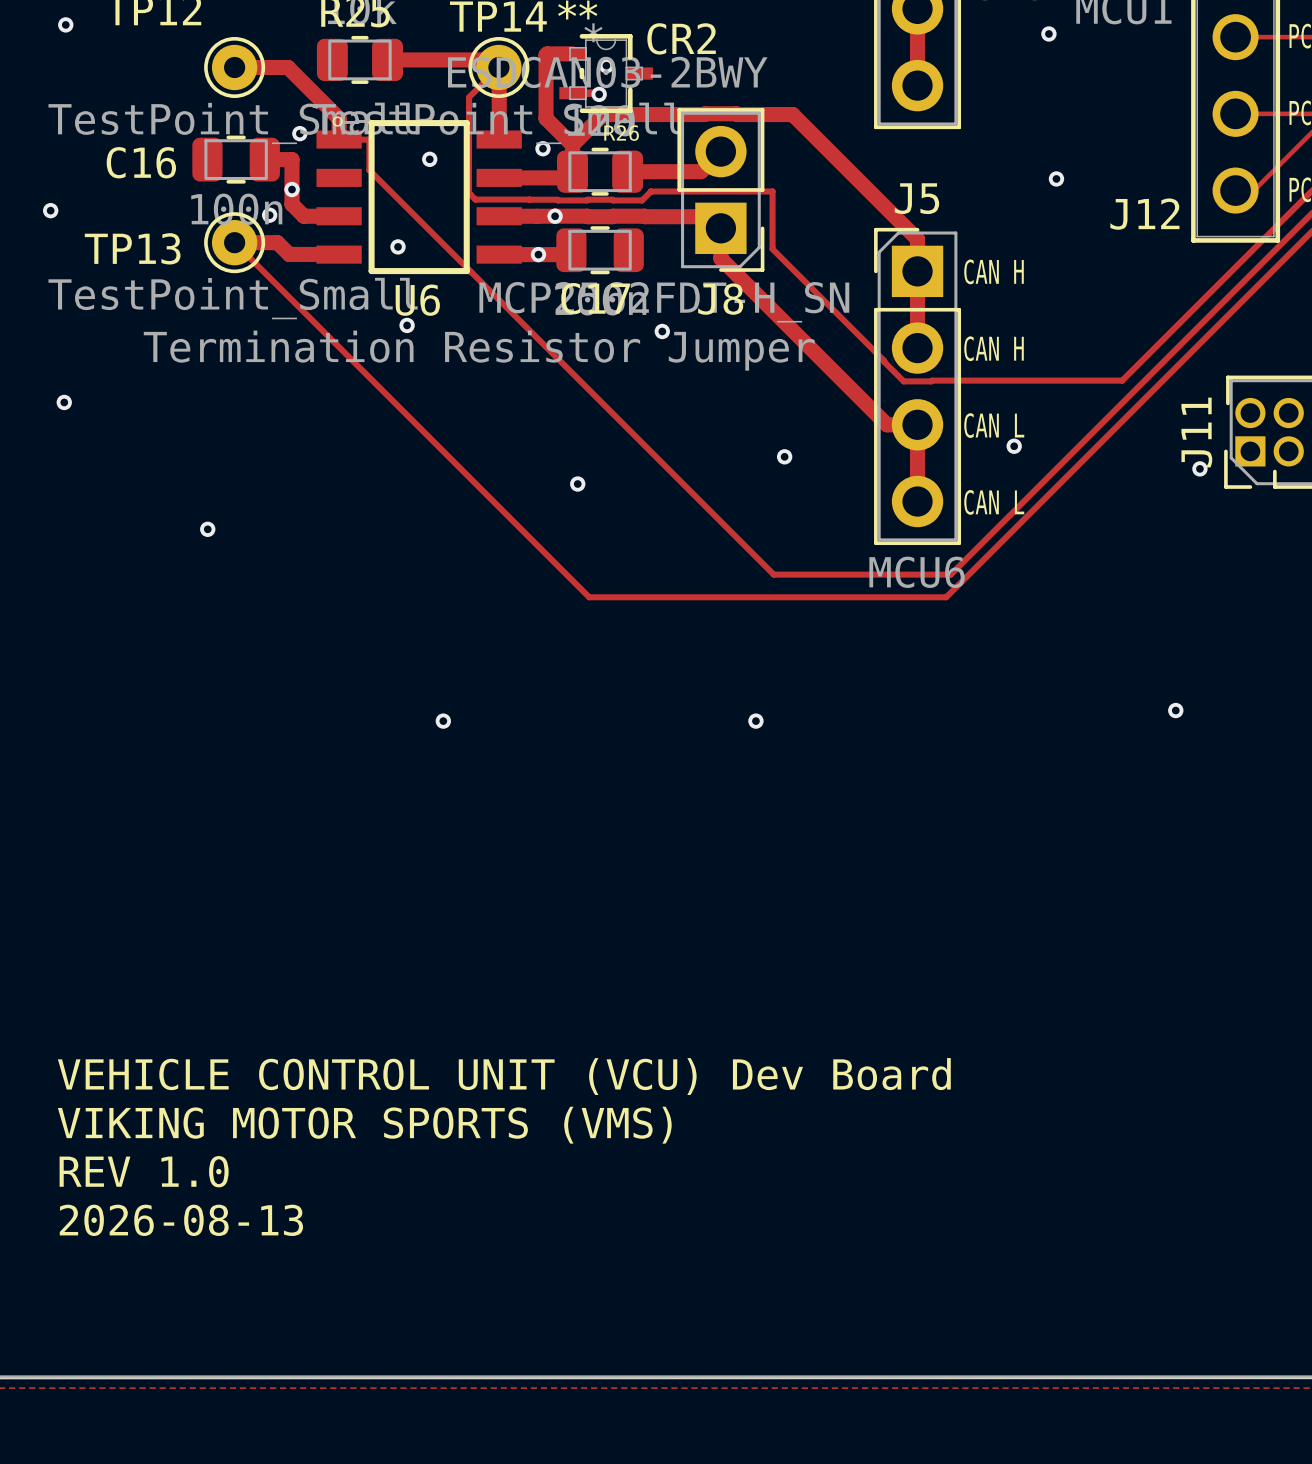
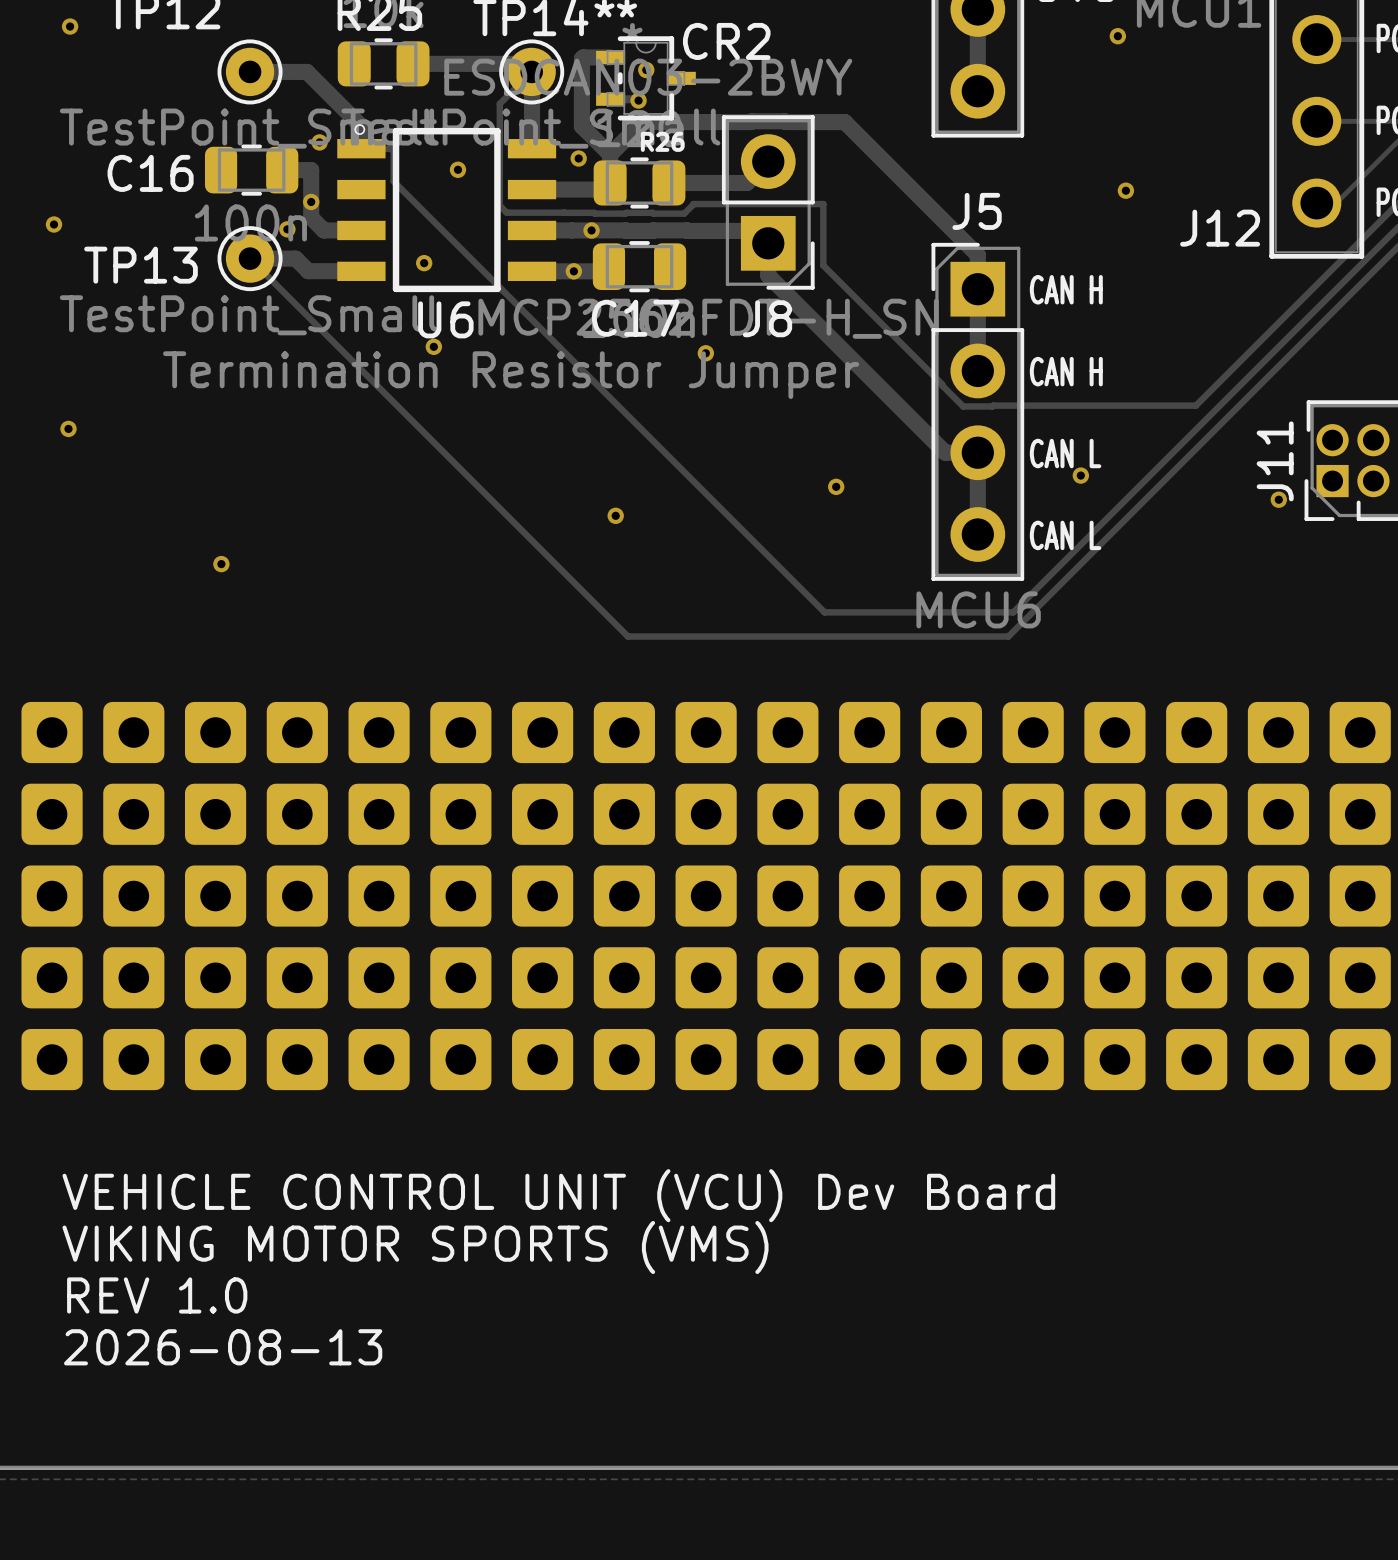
part: none -> (52, 732)
part: none -> (133, 732)
part: none -> (215, 732)
part: none -> (297, 732)
part: none -> (379, 732)
part: none -> (460, 732)
part: none -> (542, 732)
part: none -> (624, 732)
part: none -> (706, 732)
part: none -> (787, 732)
part: none -> (869, 732)
part: none -> (951, 732)
part: none -> (1033, 732)
part: none -> (1114, 732)
part: none -> (1196, 732)
part: none -> (1278, 732)
part: none -> (1360, 732)
via: (1175, 710) -> none
via: (443, 721) -> none
via: (755, 721) -> none
part: none -> (52, 814)
part: none -> (133, 814)
part: none -> (215, 814)
part: none -> (297, 814)
part: none -> (379, 814)
part: none -> (460, 814)
part: none -> (542, 814)
part: none -> (624, 814)
part: none -> (706, 814)
part: none -> (787, 814)
part: none -> (869, 814)
part: none -> (951, 814)
part: none -> (1033, 814)
part: none -> (1114, 814)
part: none -> (1196, 814)
part: none -> (1278, 814)
part: none -> (1360, 814)
part: none -> (52, 896)
part: none -> (133, 896)
part: none -> (215, 896)
part: none -> (297, 896)
part: none -> (379, 896)
part: none -> (460, 896)
part: none -> (542, 896)
part: none -> (624, 896)
part: none -> (706, 896)
part: none -> (787, 896)
part: none -> (869, 896)
part: none -> (951, 896)
part: none -> (1033, 896)
part: none -> (1114, 896)
part: none -> (1196, 896)
part: none -> (1278, 896)
part: none -> (1360, 896)
part: none -> (52, 977)
part: none -> (133, 977)
part: none -> (215, 977)
part: none -> (297, 977)
part: none -> (379, 977)
part: none -> (460, 977)
part: none -> (542, 977)
part: none -> (624, 977)
part: none -> (706, 977)
part: none -> (787, 977)
part: none -> (869, 977)
part: none -> (951, 977)
part: none -> (1033, 977)
part: none -> (1114, 977)
part: none -> (1196, 977)
part: none -> (1278, 977)
part: none -> (1360, 977)
part: none -> (52, 1059)
part: none -> (133, 1059)
part: none -> (215, 1059)
part: none -> (297, 1059)
part: none -> (379, 1059)
part: none -> (460, 1059)
part: none -> (542, 1059)
part: none -> (624, 1059)
part: none -> (706, 1059)
part: none -> (787, 1059)
part: none -> (869, 1059)
part: none -> (951, 1059)
part: none -> (1033, 1059)
part: none -> (1114, 1059)
part: none -> (1196, 1059)
part: none -> (1278, 1059)
part: none -> (1360, 1059)
text position: VEHICLE CONTROL UNIT (VCU) Dev Board (504, 1076) -> VEHICLE CONTROL UNIT (VCU) Dev Board (558, 1195)
text position: VIKING MOTOR SPORTS (VMS) (364, 1125) -> VIKING MOTOR SPORTS (VMS) (415, 1247)
text position: REV 1.0 (144, 1171) -> REV 1.0 (157, 1295)
text position: 2026-08-13 (181, 1220) -> 2026-08-13 (223, 1347)

